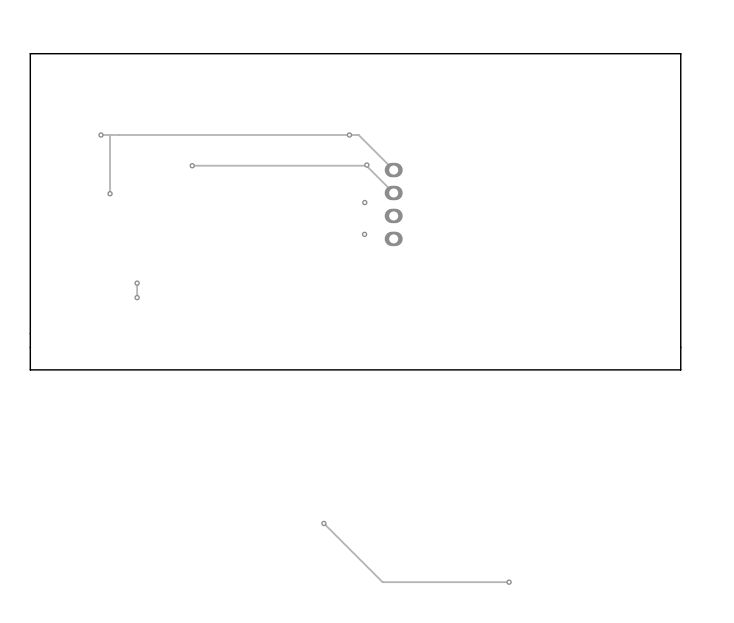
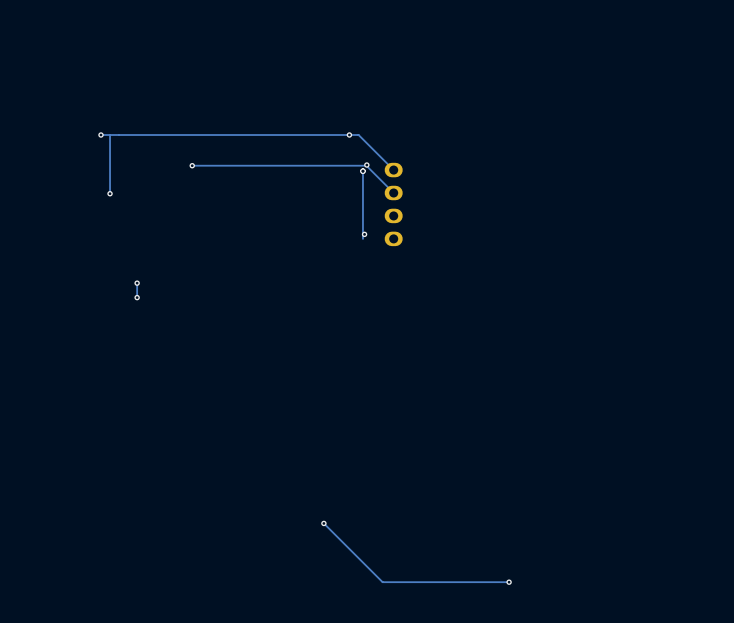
board edge: (680, 53) (680, 369) (30, 369) (30, 53) (680, 53) -> none
track: none -> (362, 171) (362, 238)
via position: (364, 202) -> (362, 171)

